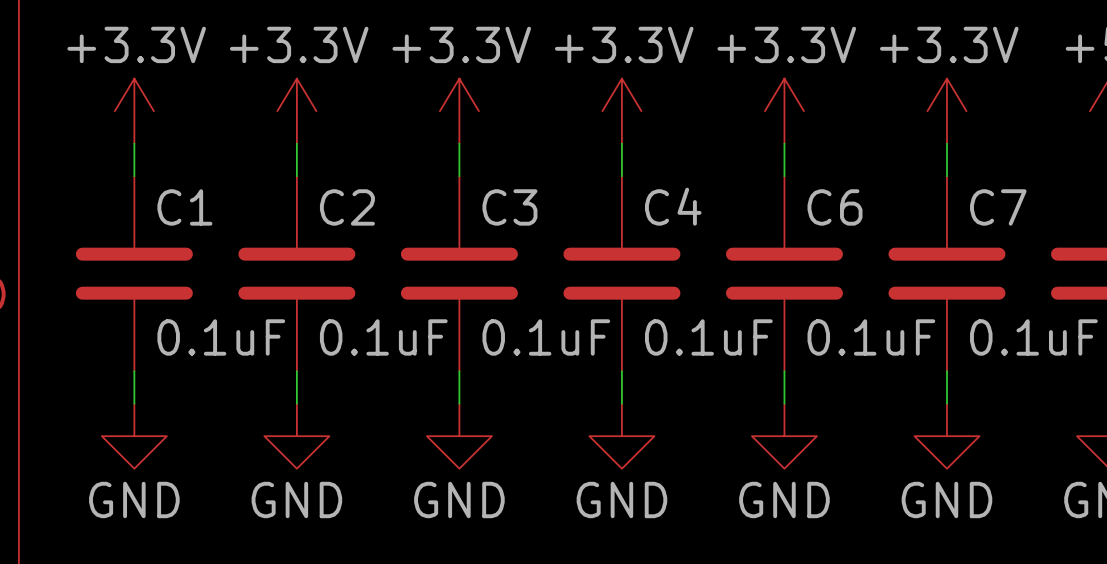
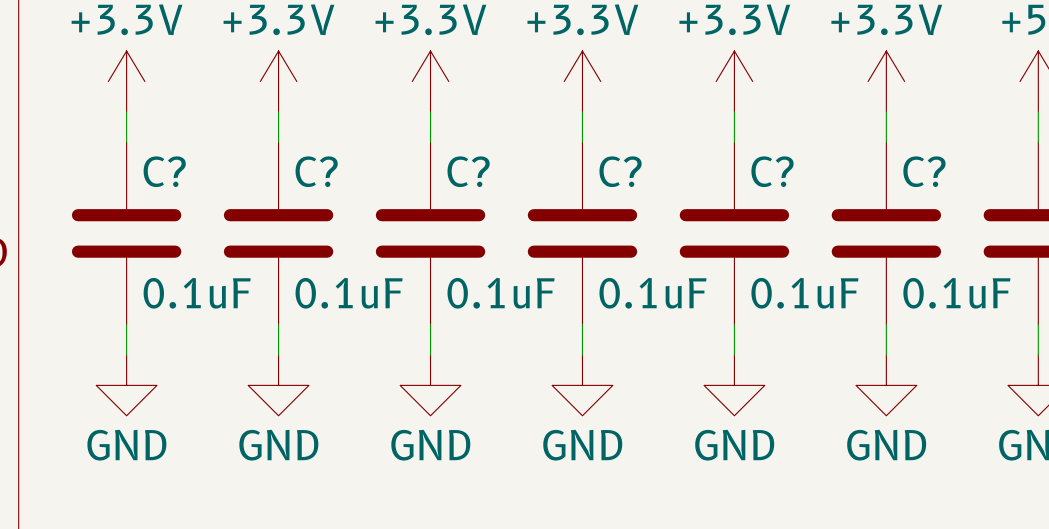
C4 name: C4 (673, 206) -> C? (620, 171)
C1 name: C1 (184, 207) -> C? (164, 171)
C2 name: C2 (347, 207) -> C? (316, 171)
C3 name: C3 (509, 207) -> C? (468, 171)
C6 name: C6 (835, 207) -> C? (772, 171)
C7 name: C7 (998, 207) -> C? (924, 171)

